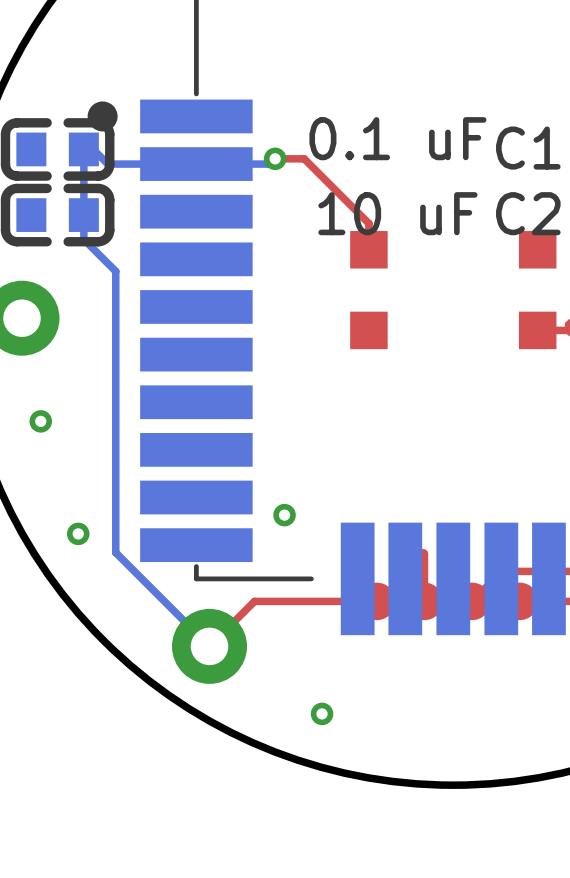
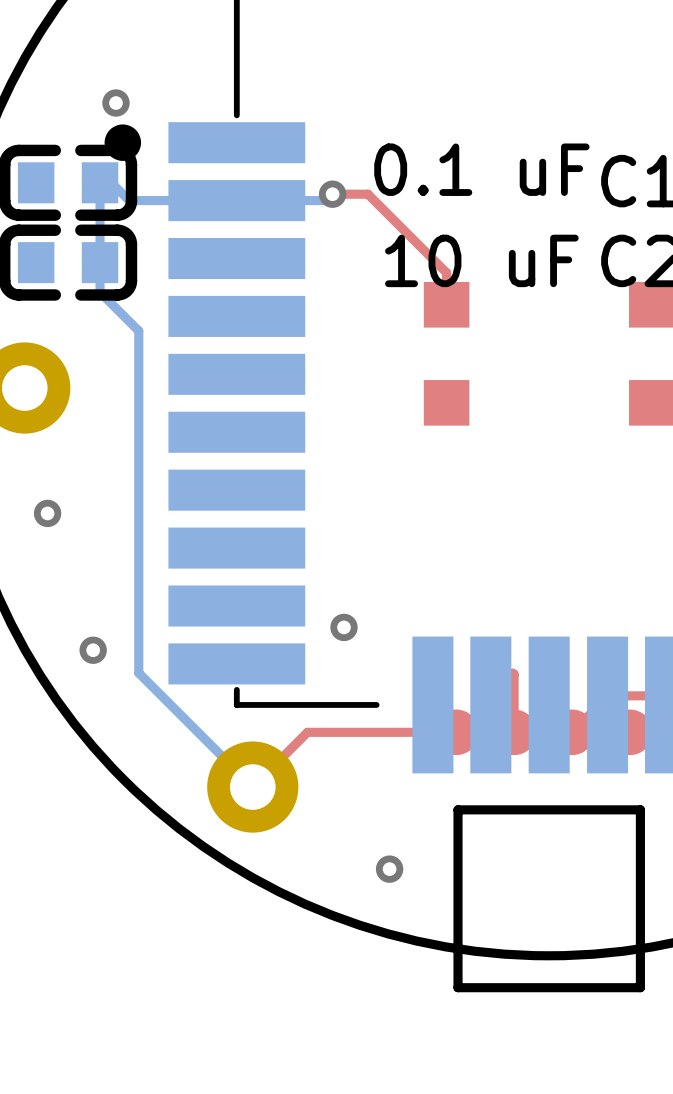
via: none -> (115, 103)
board edge: none -> (640, 809) (458, 809) (458, 987) (640, 987) (640, 809)

